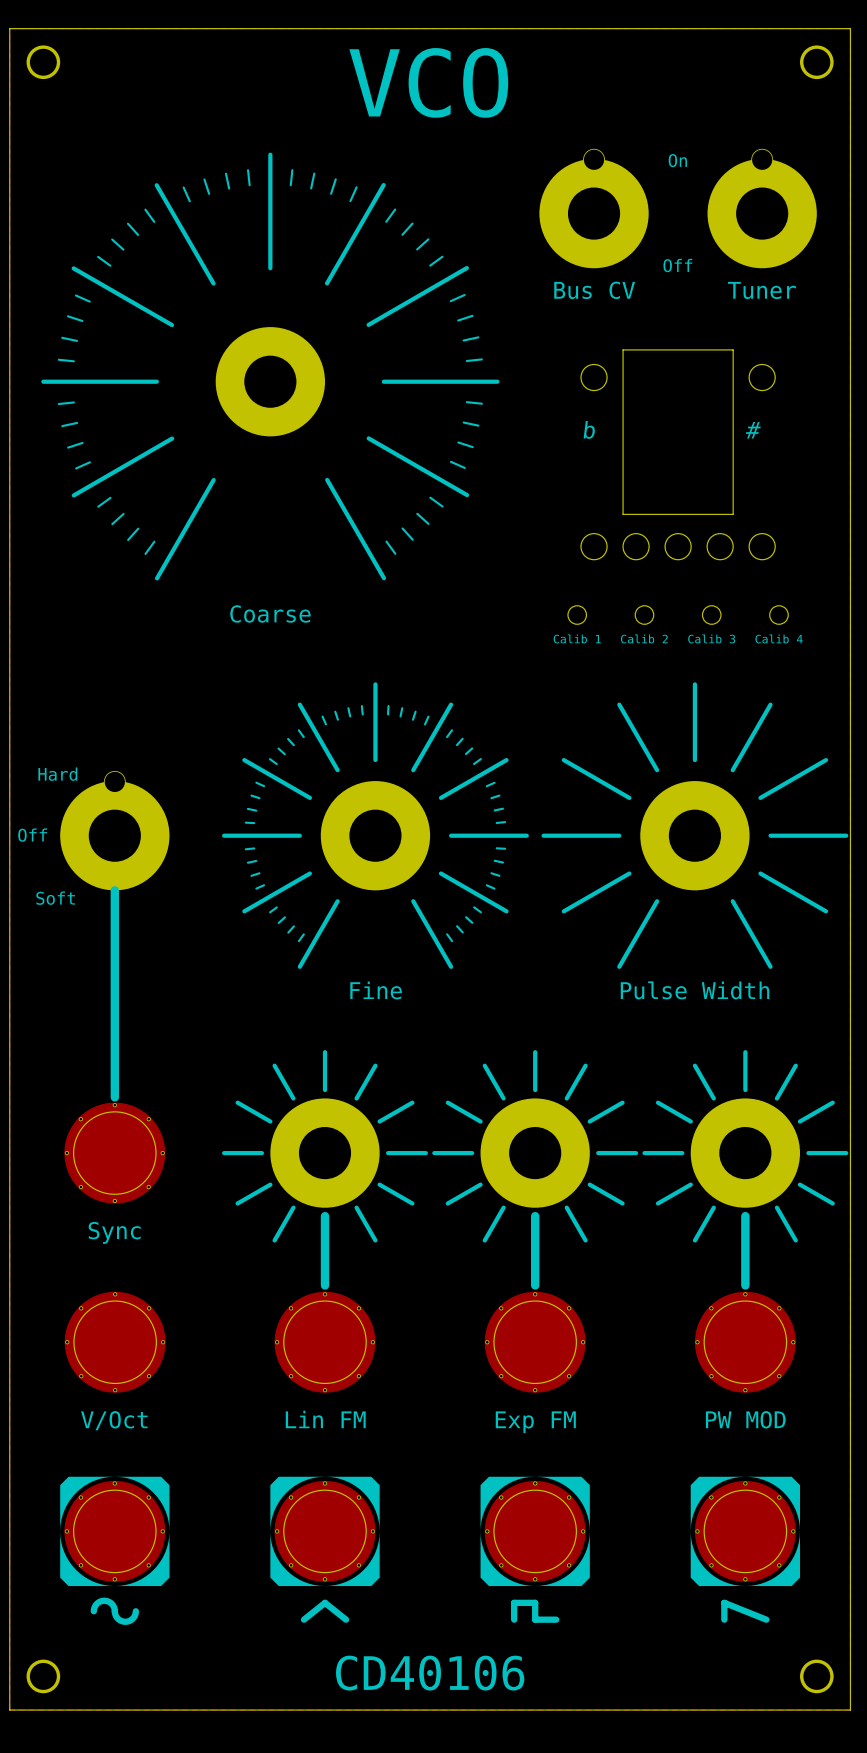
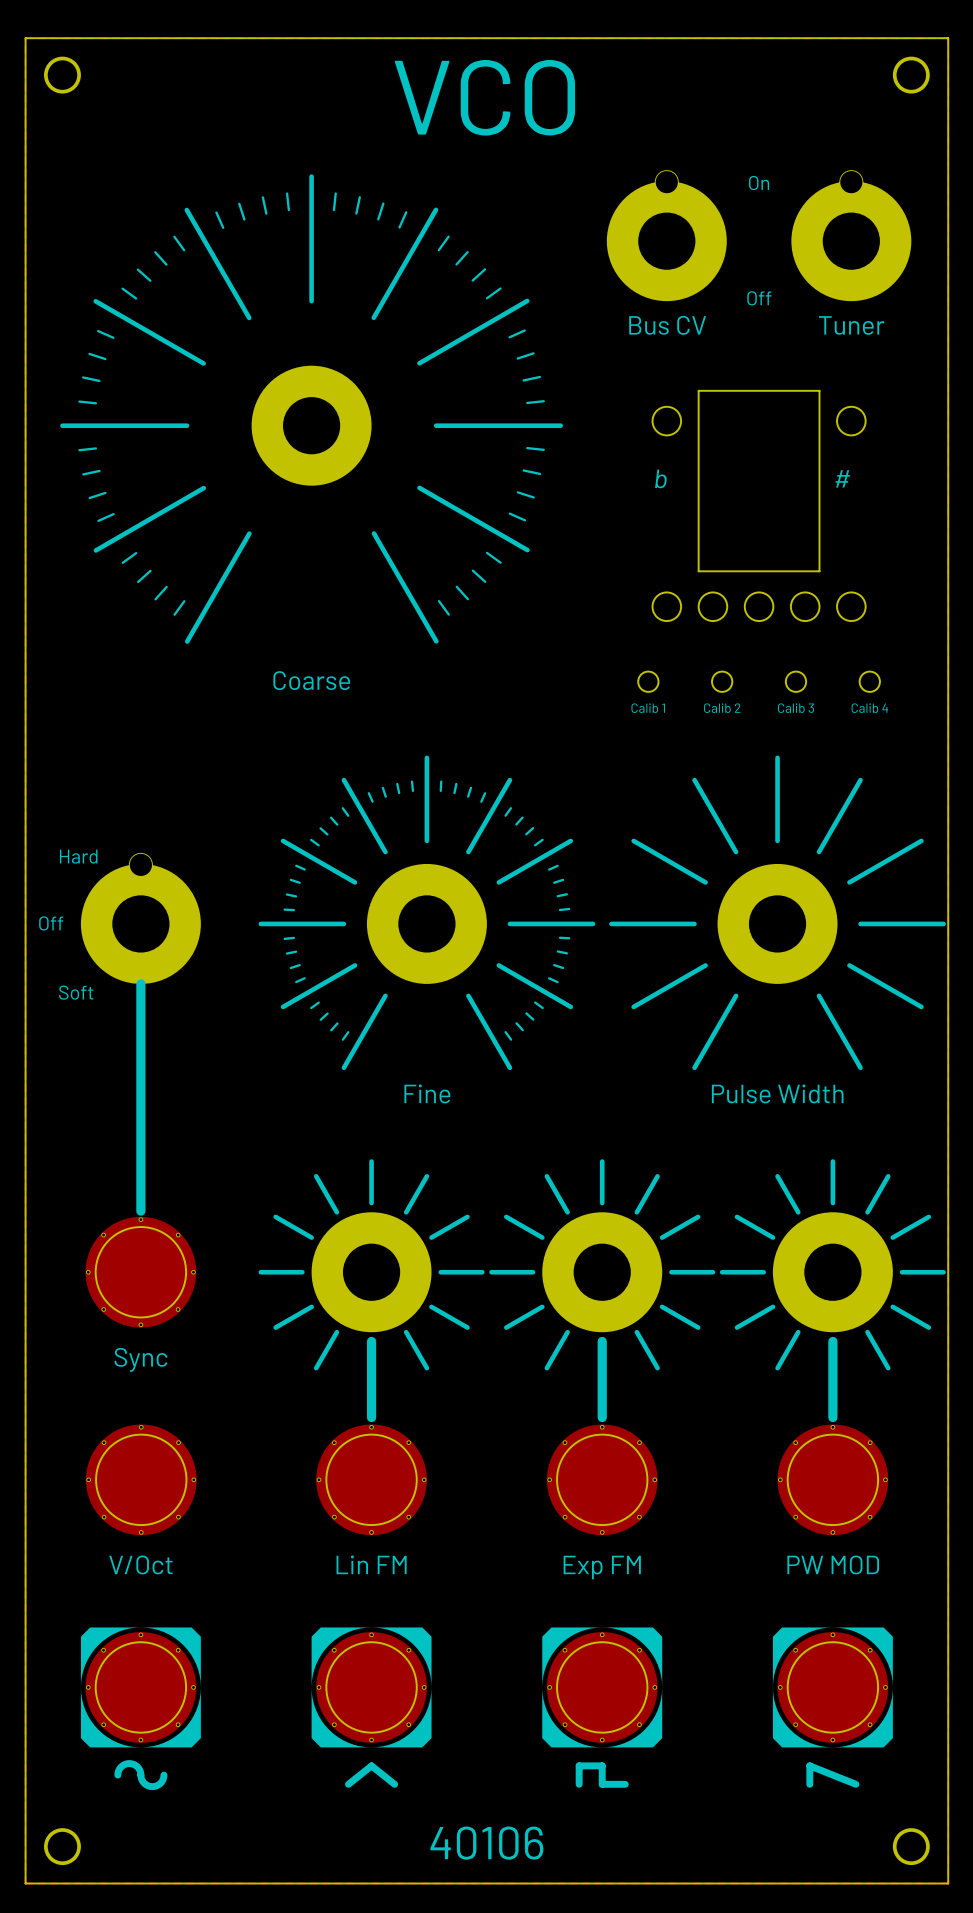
text: CD40106 (430, 1673) -> 40106 (486, 1843)

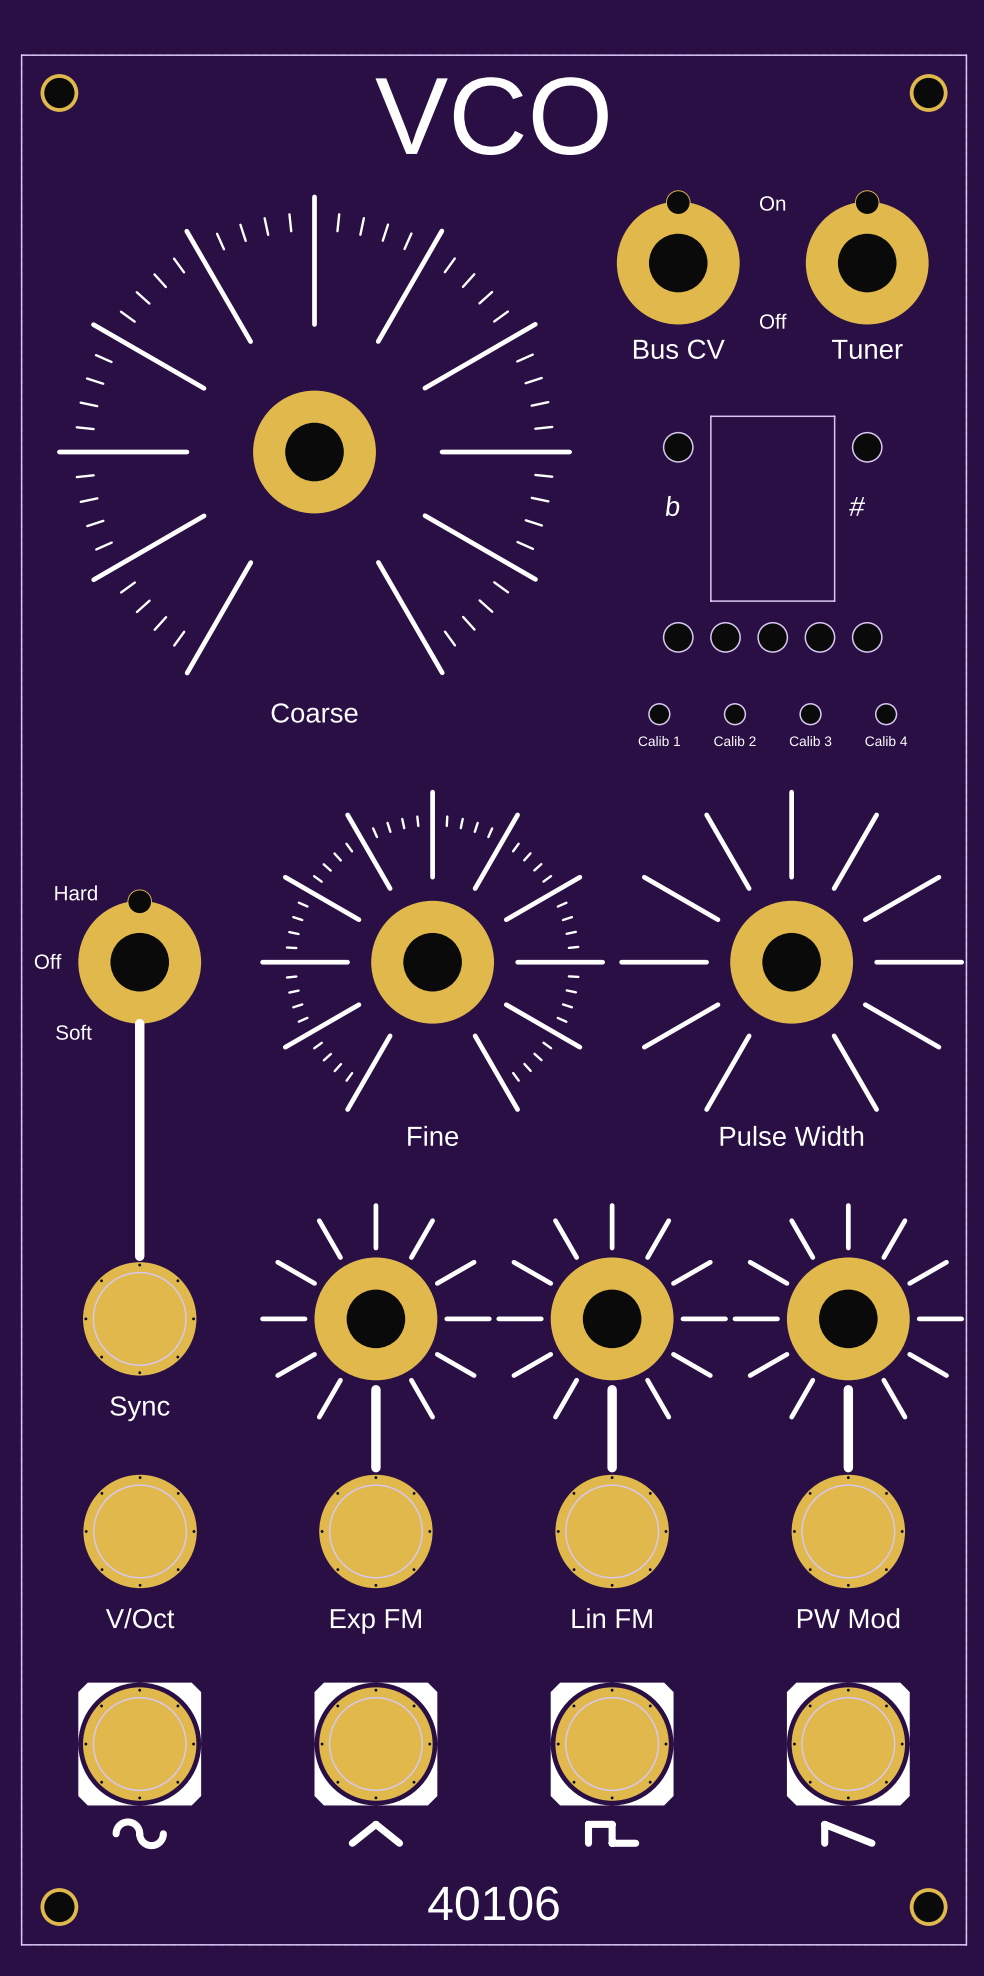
part value: Lin FM (371, 1564) -> Exp FM (375, 1621)
part value: PW MOD (833, 1564) -> PW Mod (848, 1618)
part value: Exp FM (602, 1567) -> Lin FM (612, 1618)

